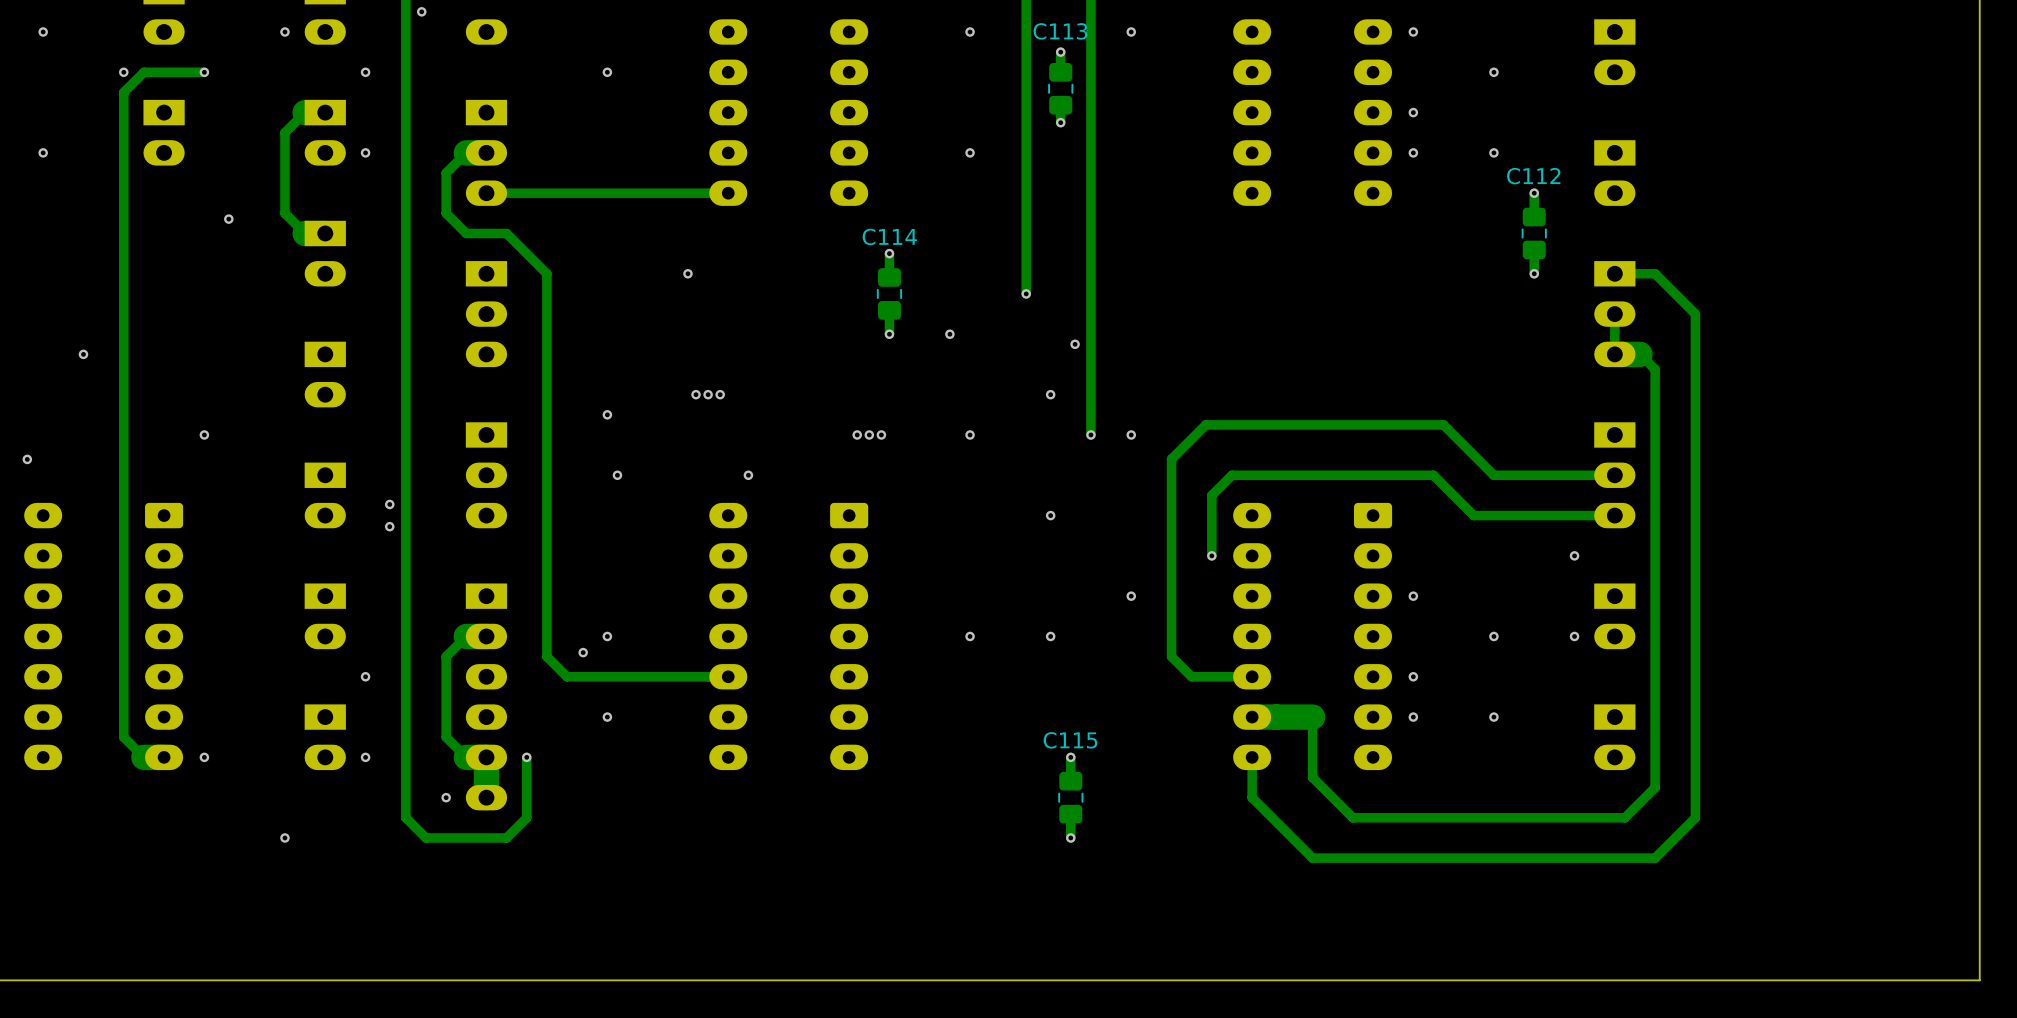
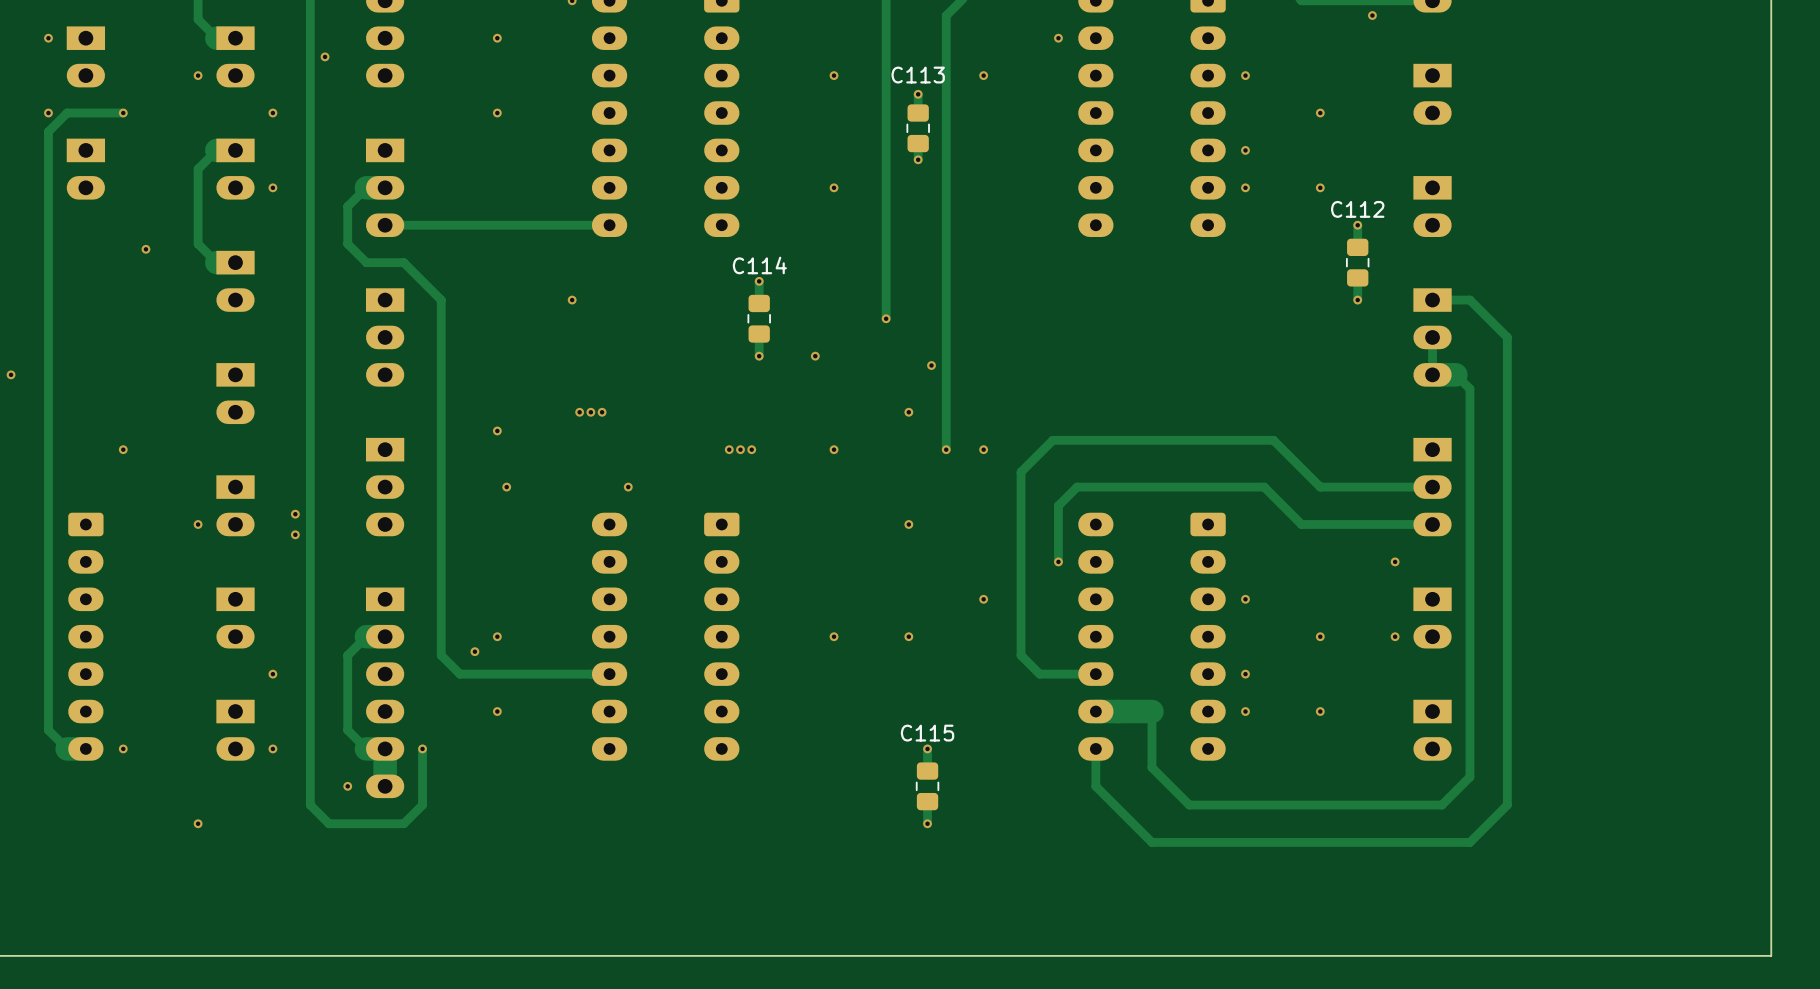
via: none -> (198, 524)

